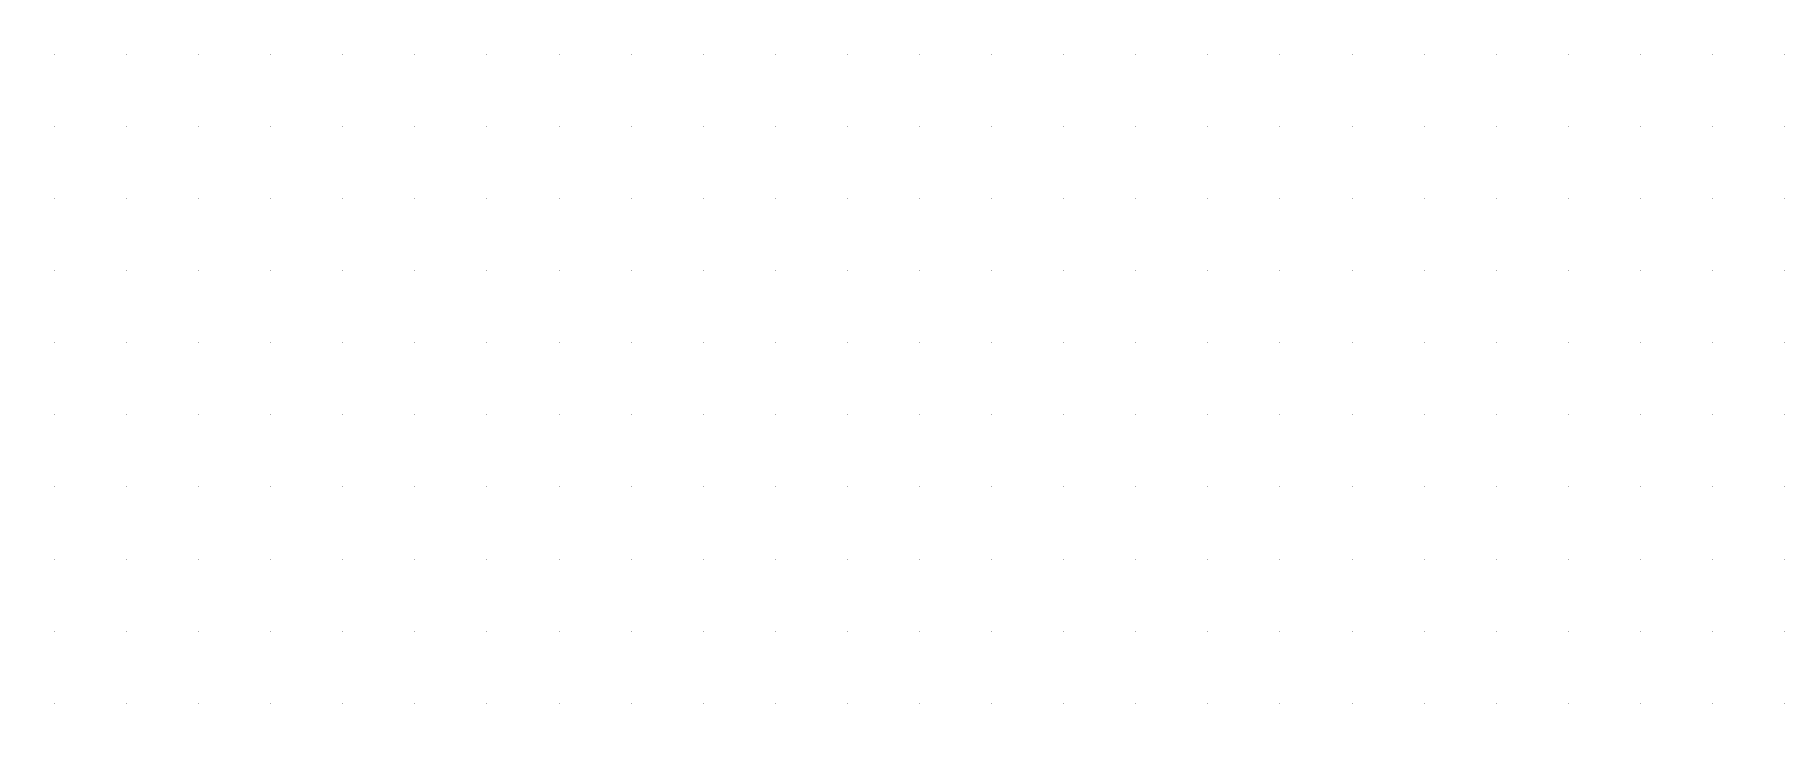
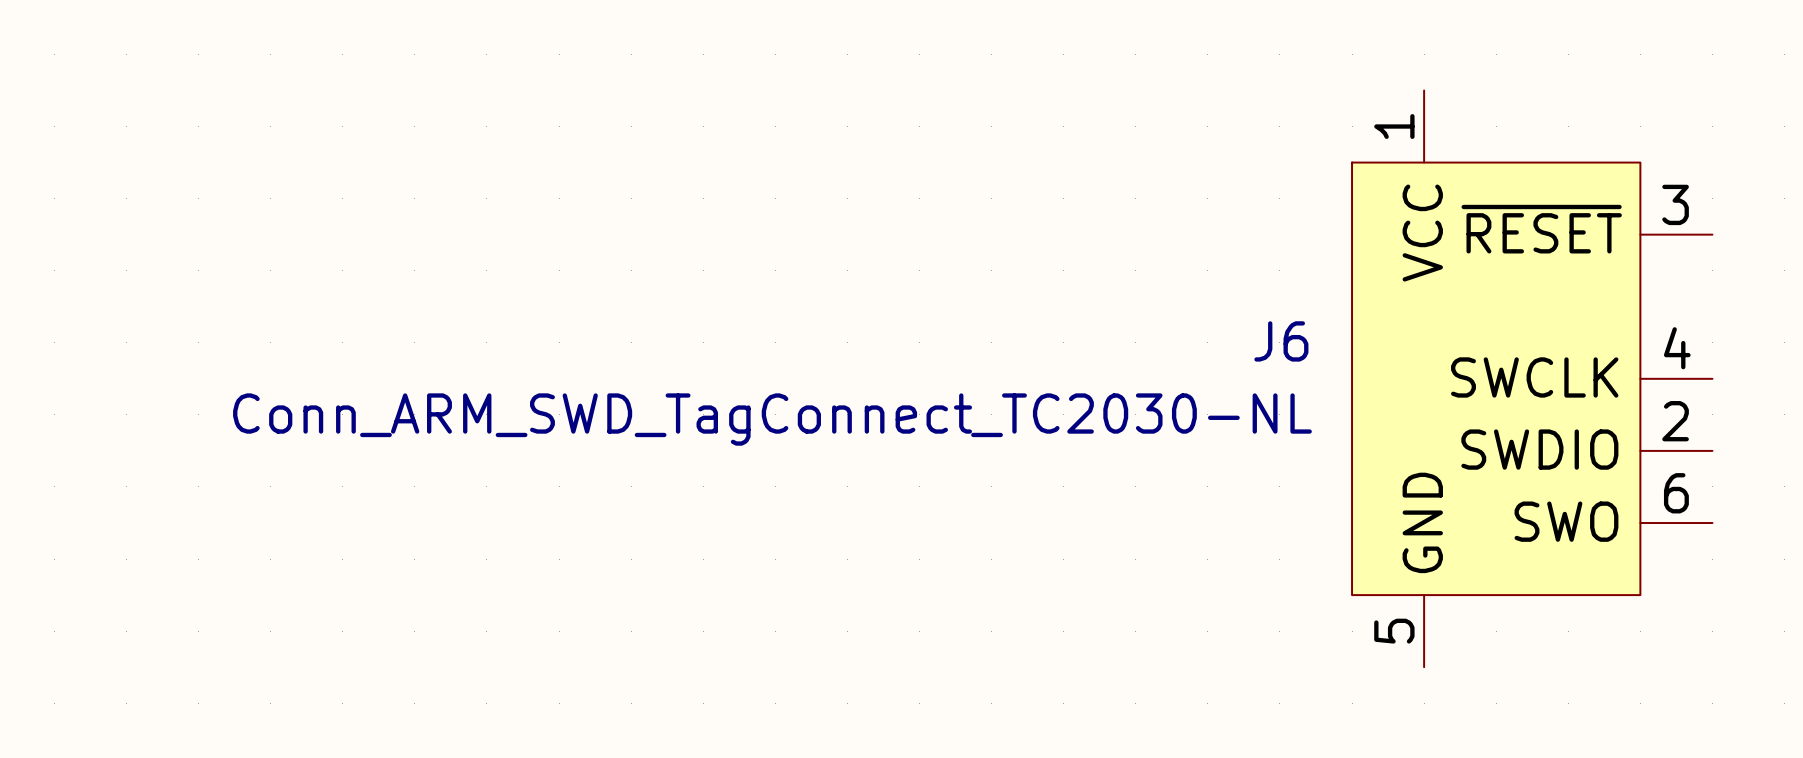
J6: none -> Conn_ARM_SWD_TagConnect_TC2030-NL (1532, 378)

